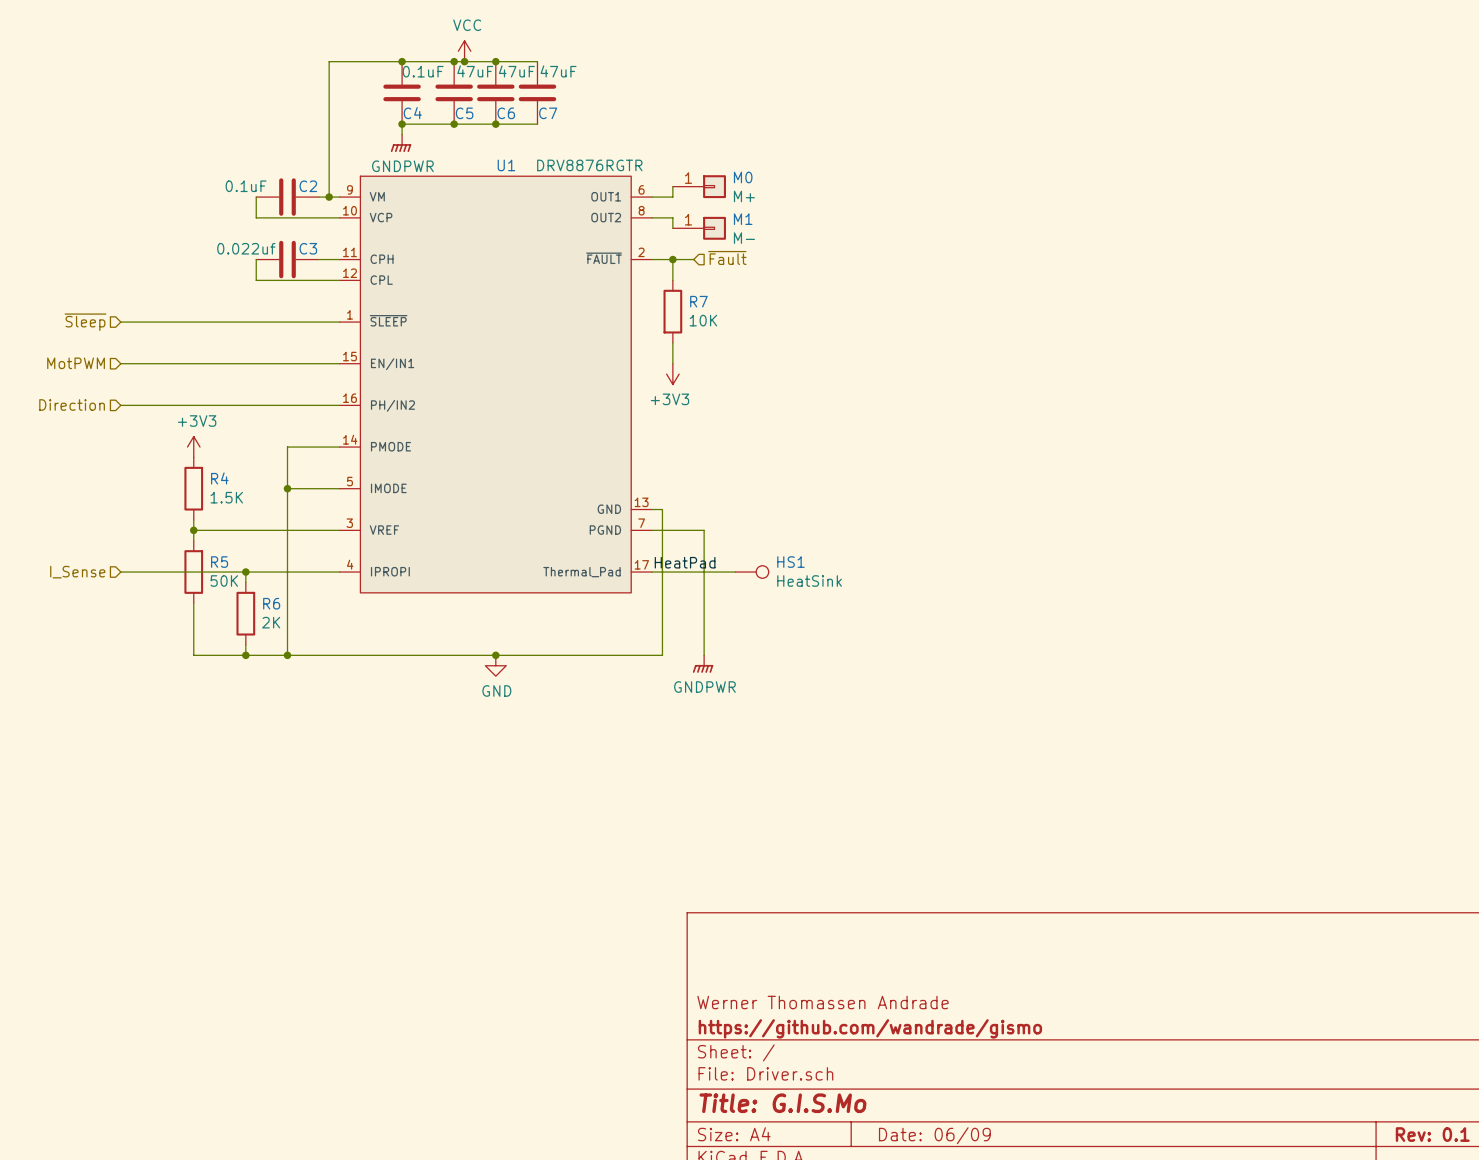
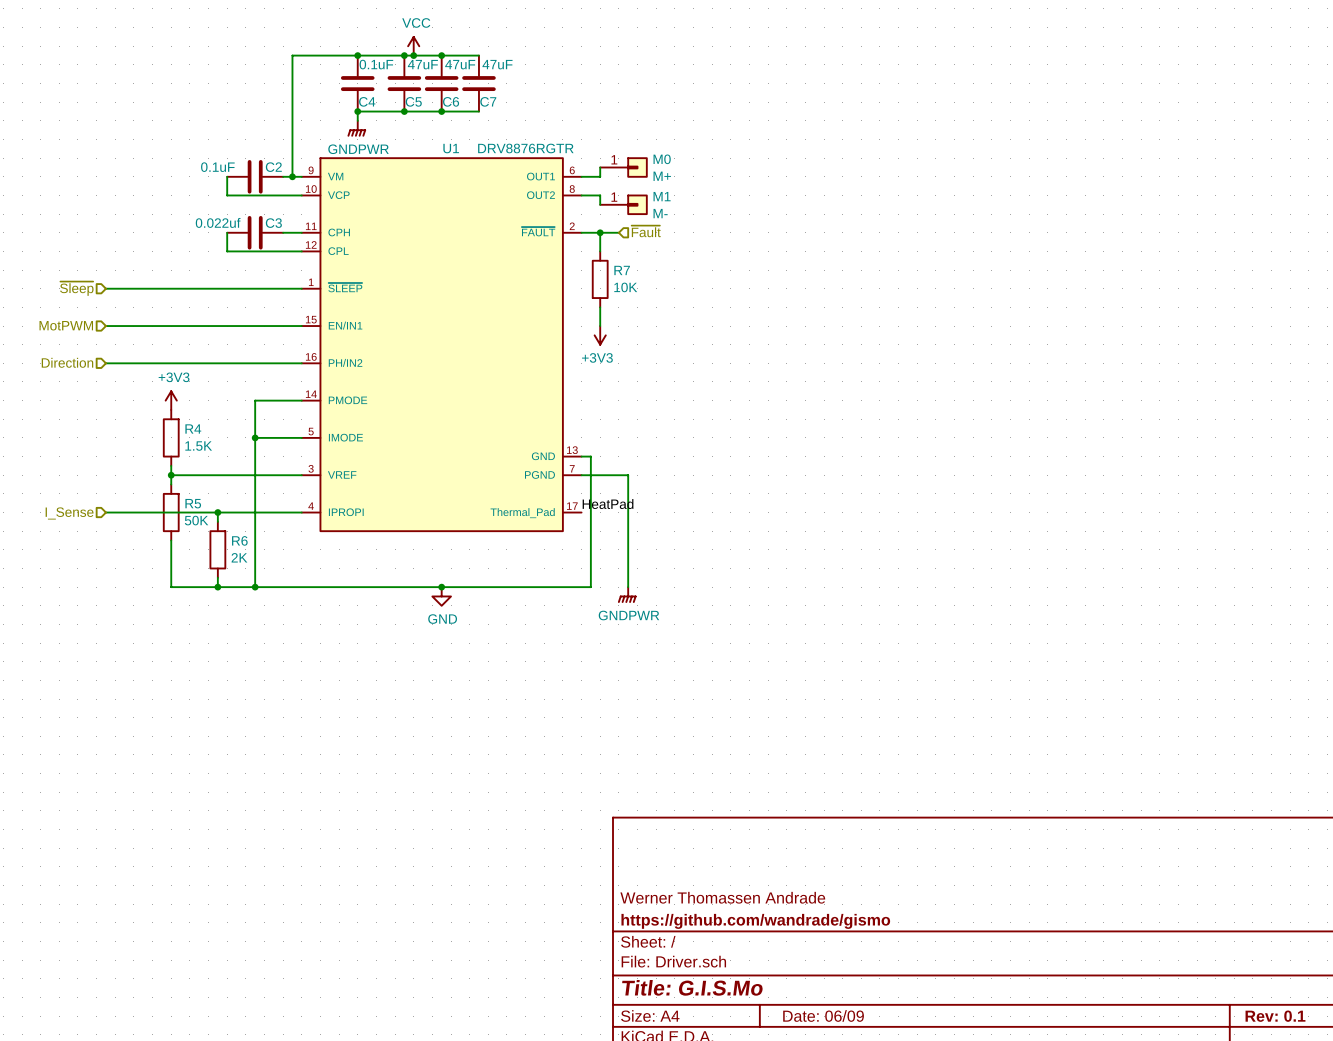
wire: (652, 572) (735, 572) -> none
HS1: HeatSink (752, 572) -> none

